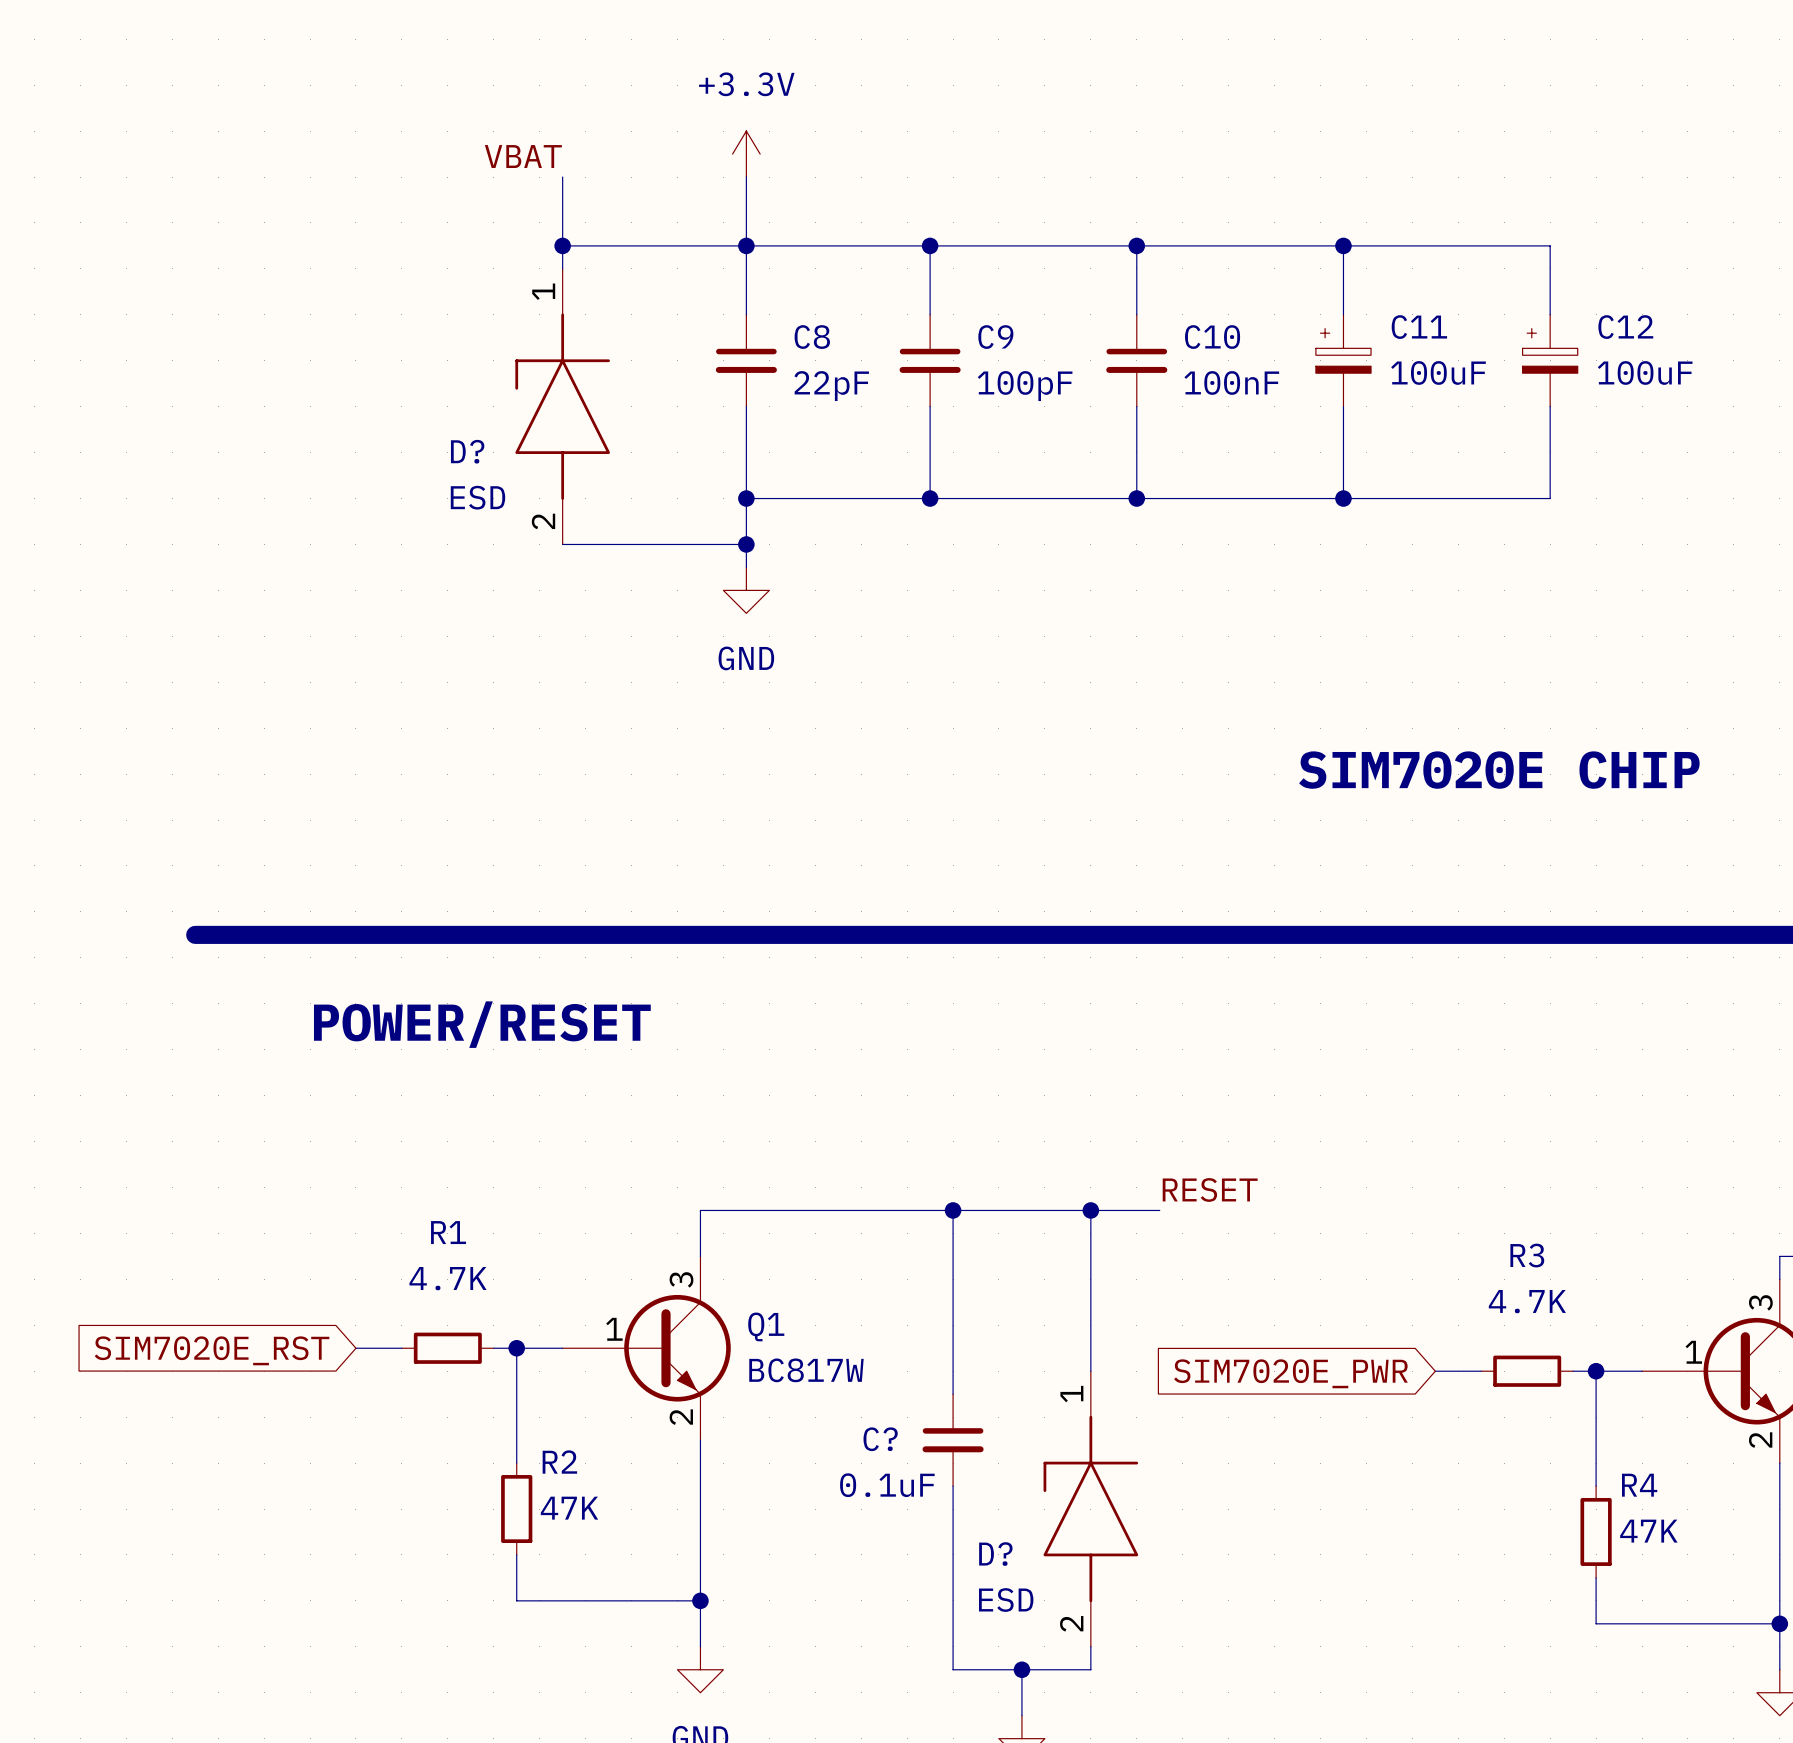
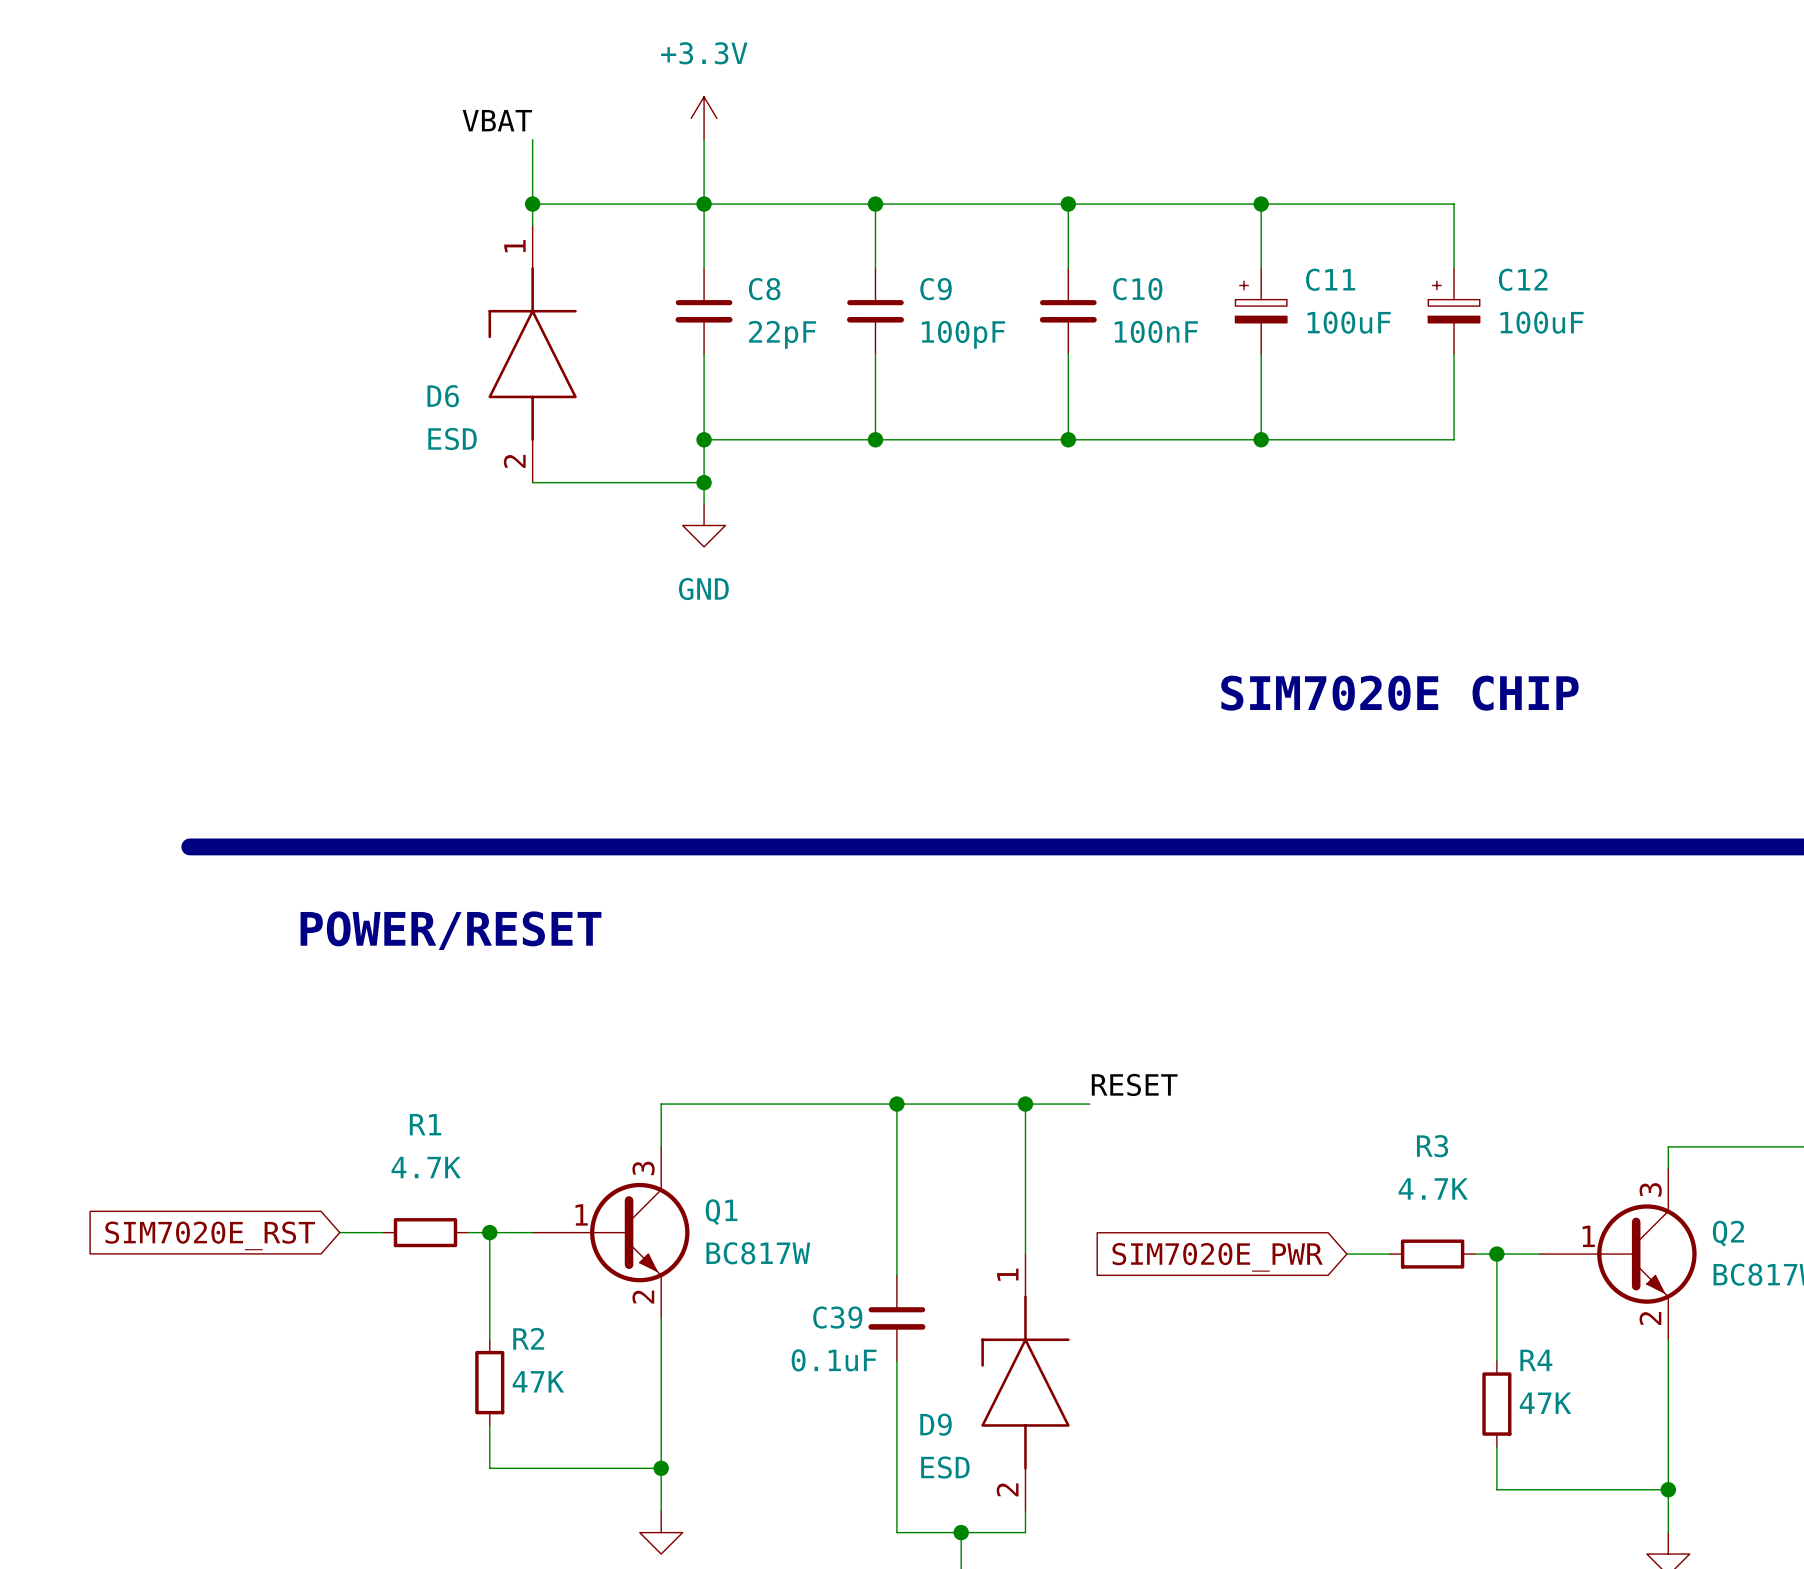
D? name: D? (467, 451) -> D6 (443, 396)
C? name: C? (880, 1439) -> C39 (837, 1317)
D? name: D? (995, 1554) -> D9 (936, 1424)

